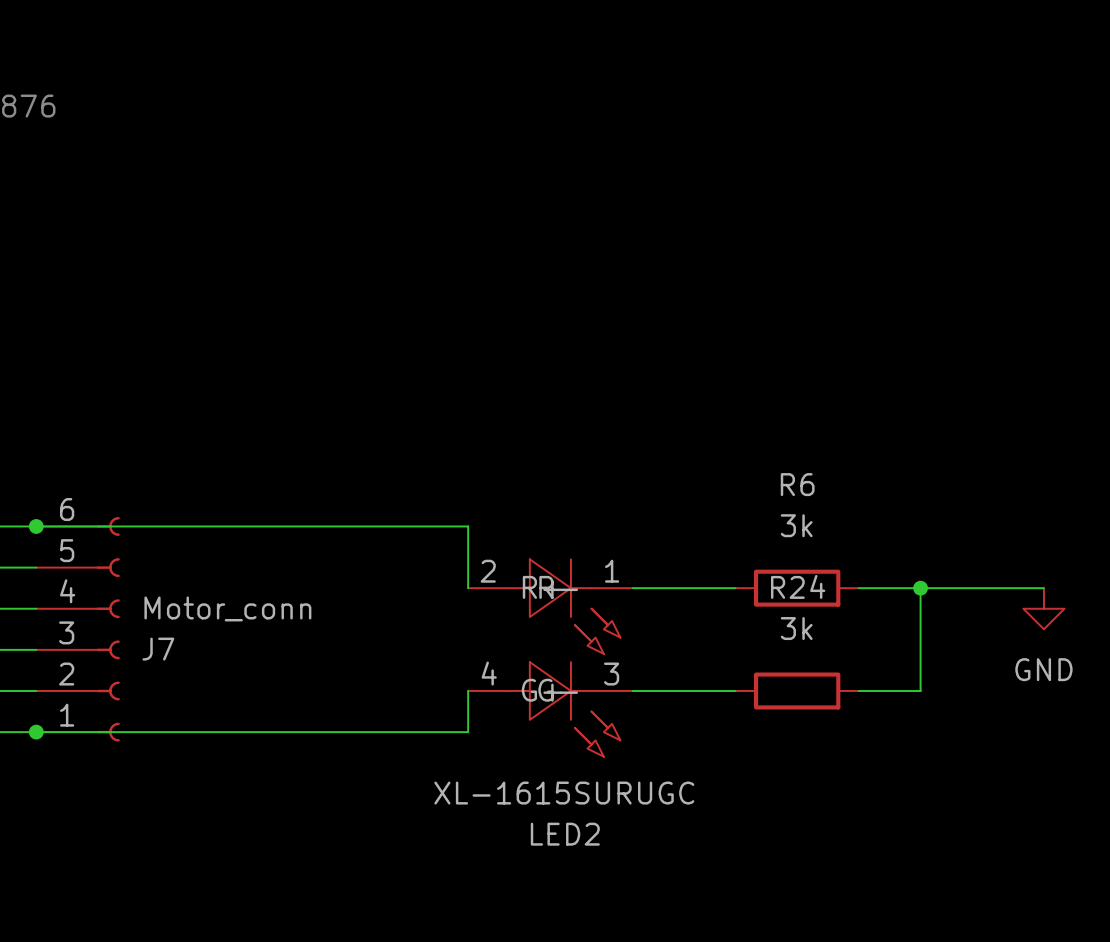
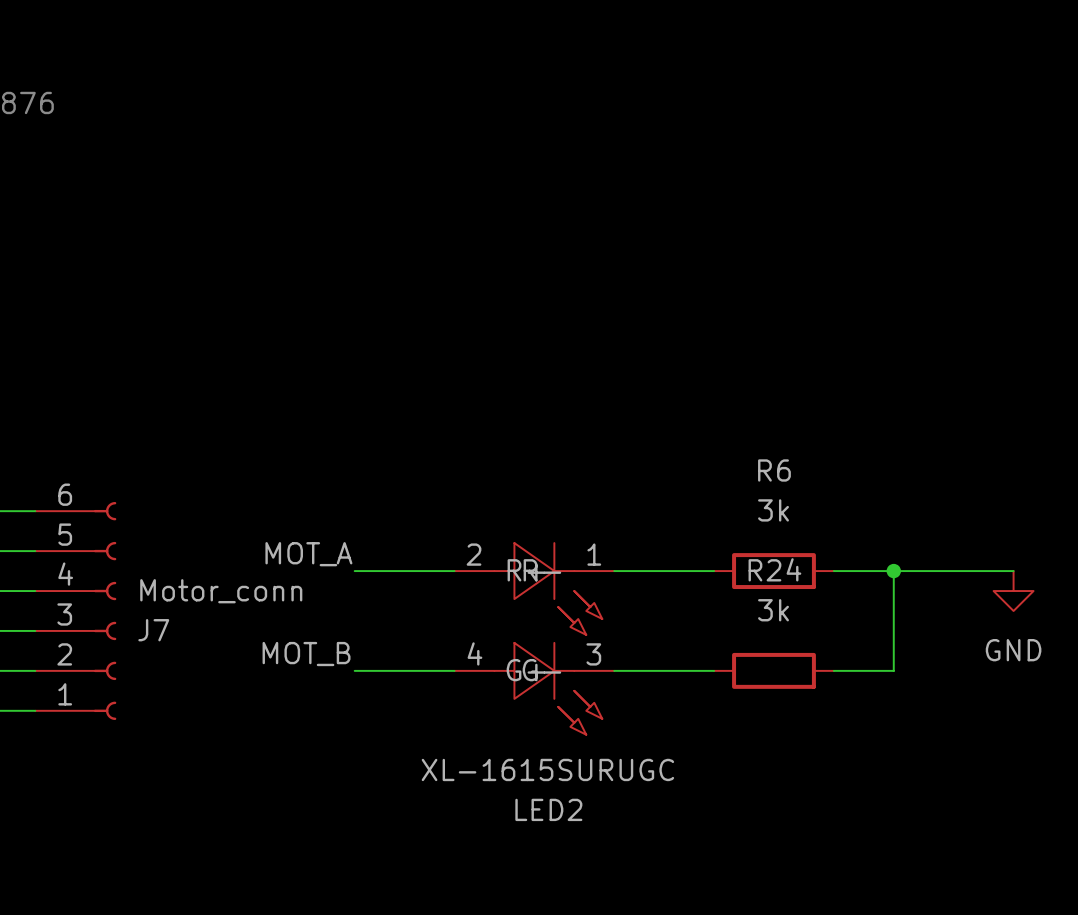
wire: (36, 526) (468, 526) (468, 588) -> (354, 571) (454, 571)
junction: (36, 526) -> none
label: none -> MOT_A (308, 554)
label: none -> MOT_B (306, 654)
wire: (468, 690) (468, 732) (36, 732) -> (454, 670) (354, 670)
junction: (36, 732) -> none

